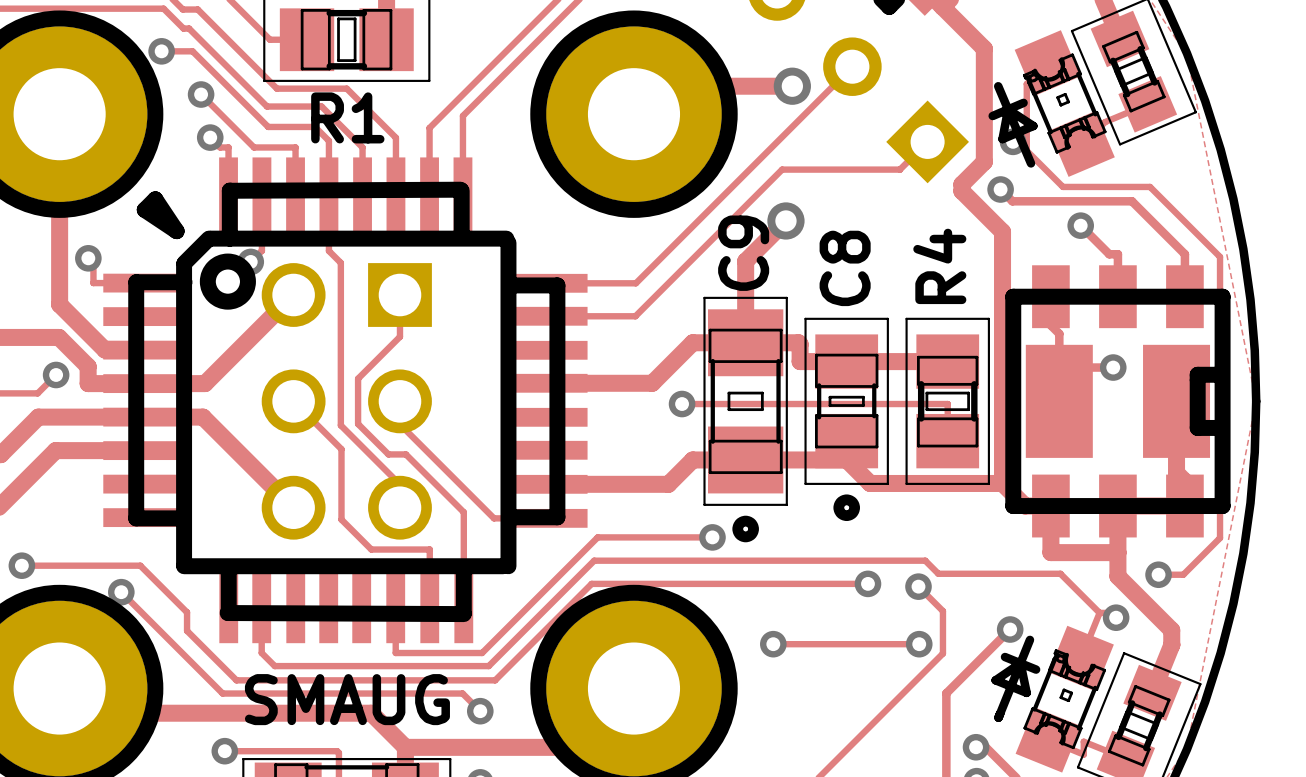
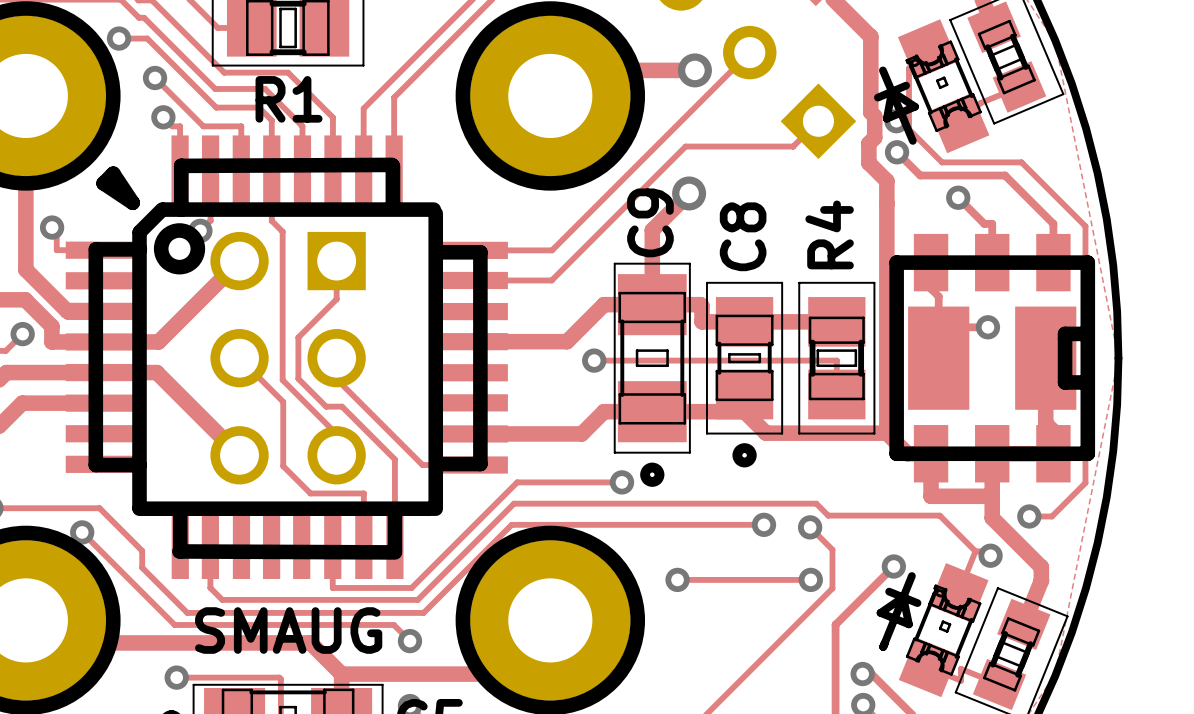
track: (984, 48) (984, 161) (961, 184) (961, 191) (1002, 231) -> (870, 36) (870, 112) (874, 116) (874, 137) (868, 143) (868, 162) (886, 180) (886, 203)
track: (1000, 189) (1012, 201) (1039, 201) -> (897, 152) (920, 175)
via position: (1000, 189) -> (897, 152)

